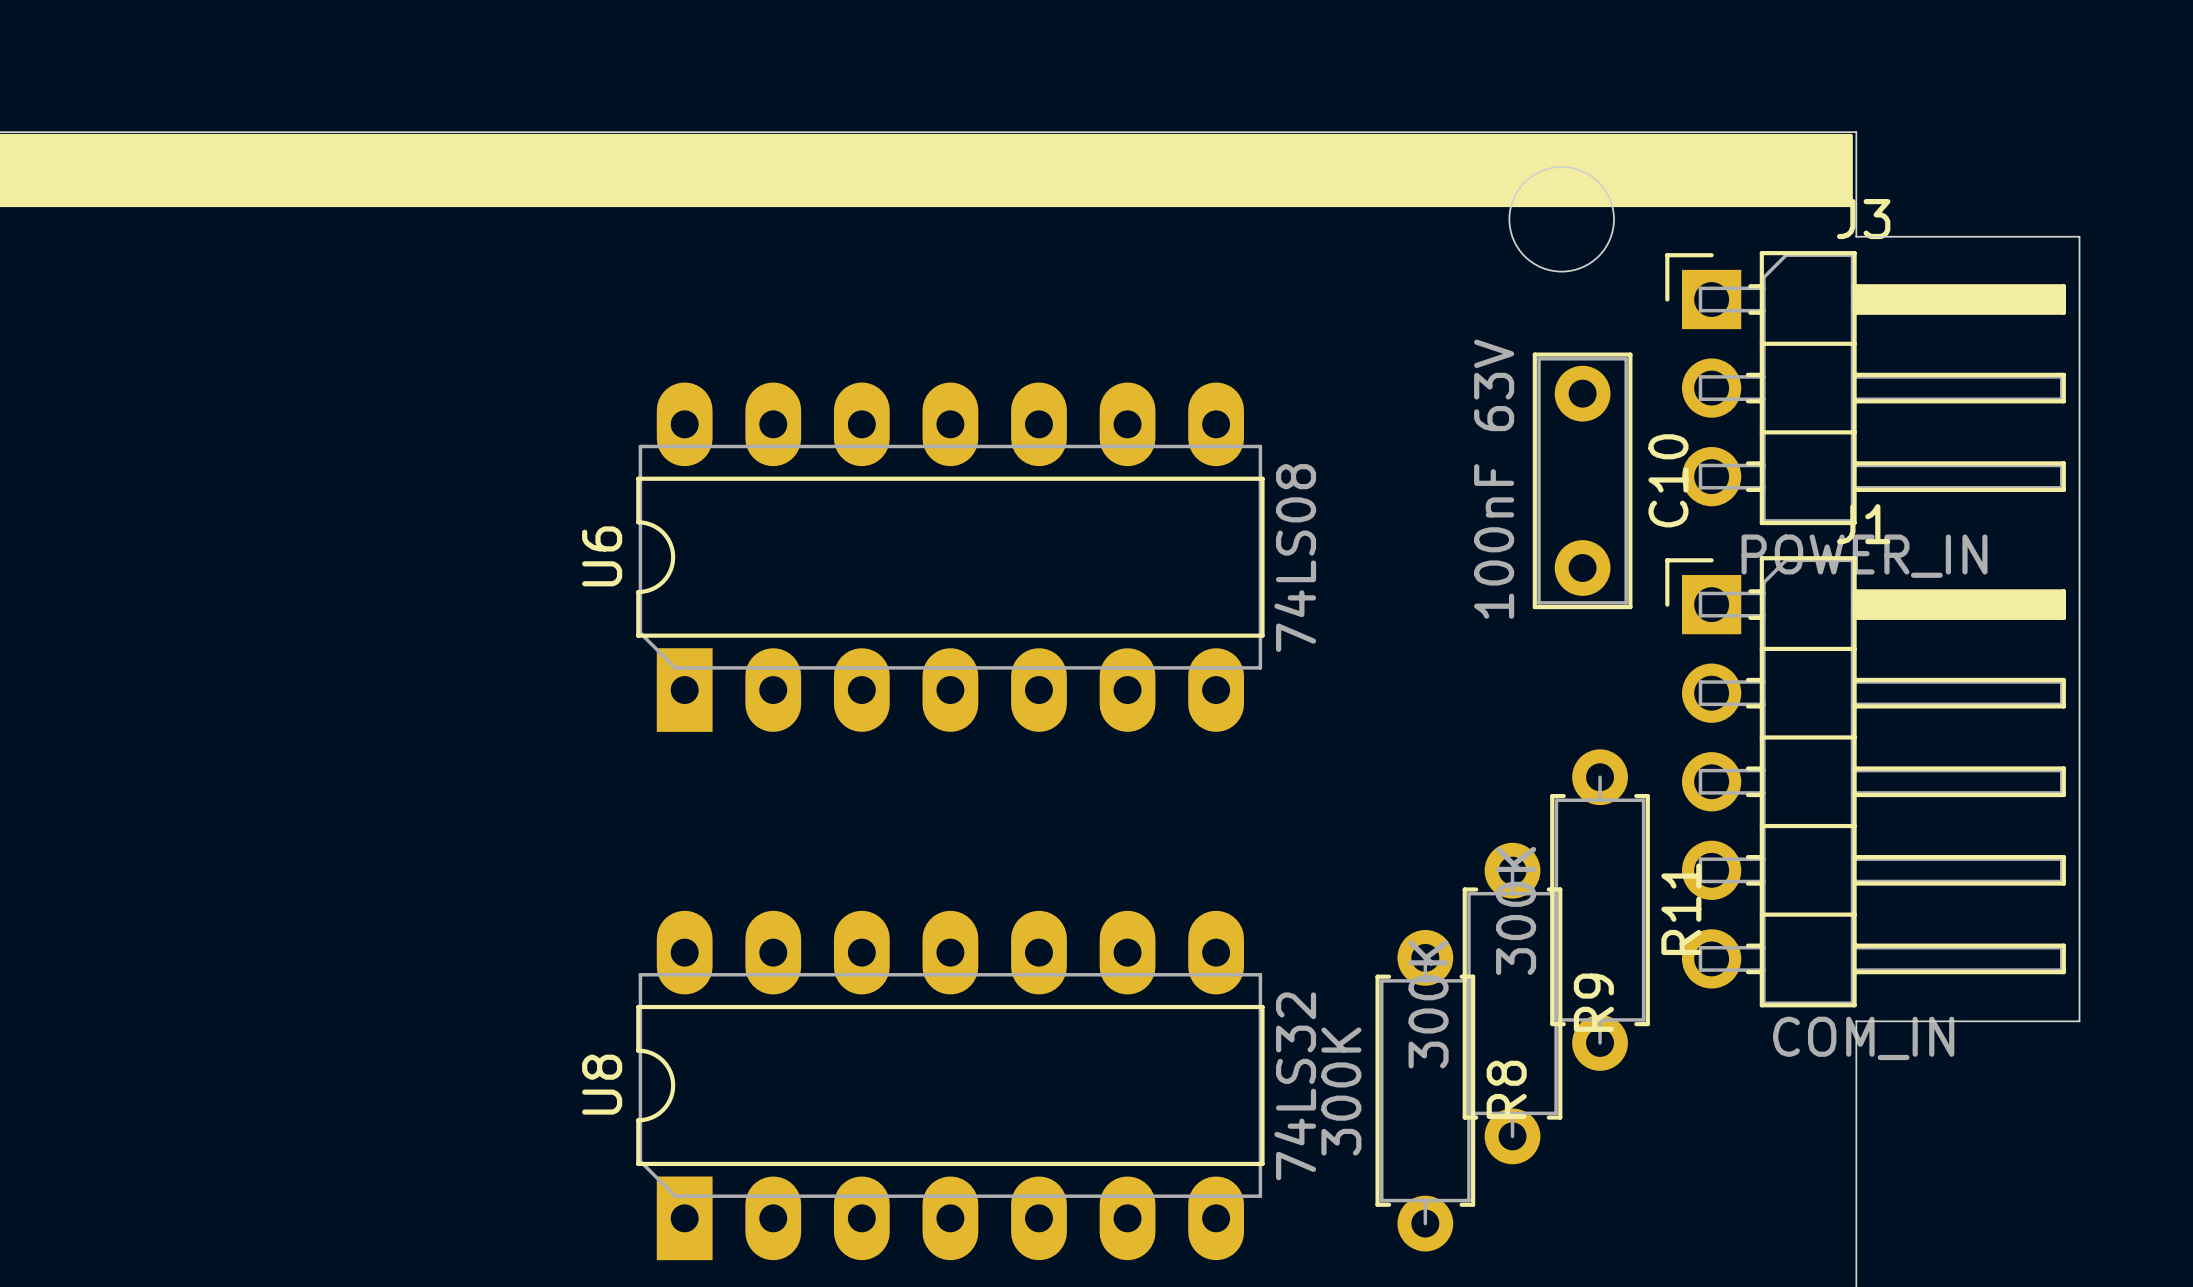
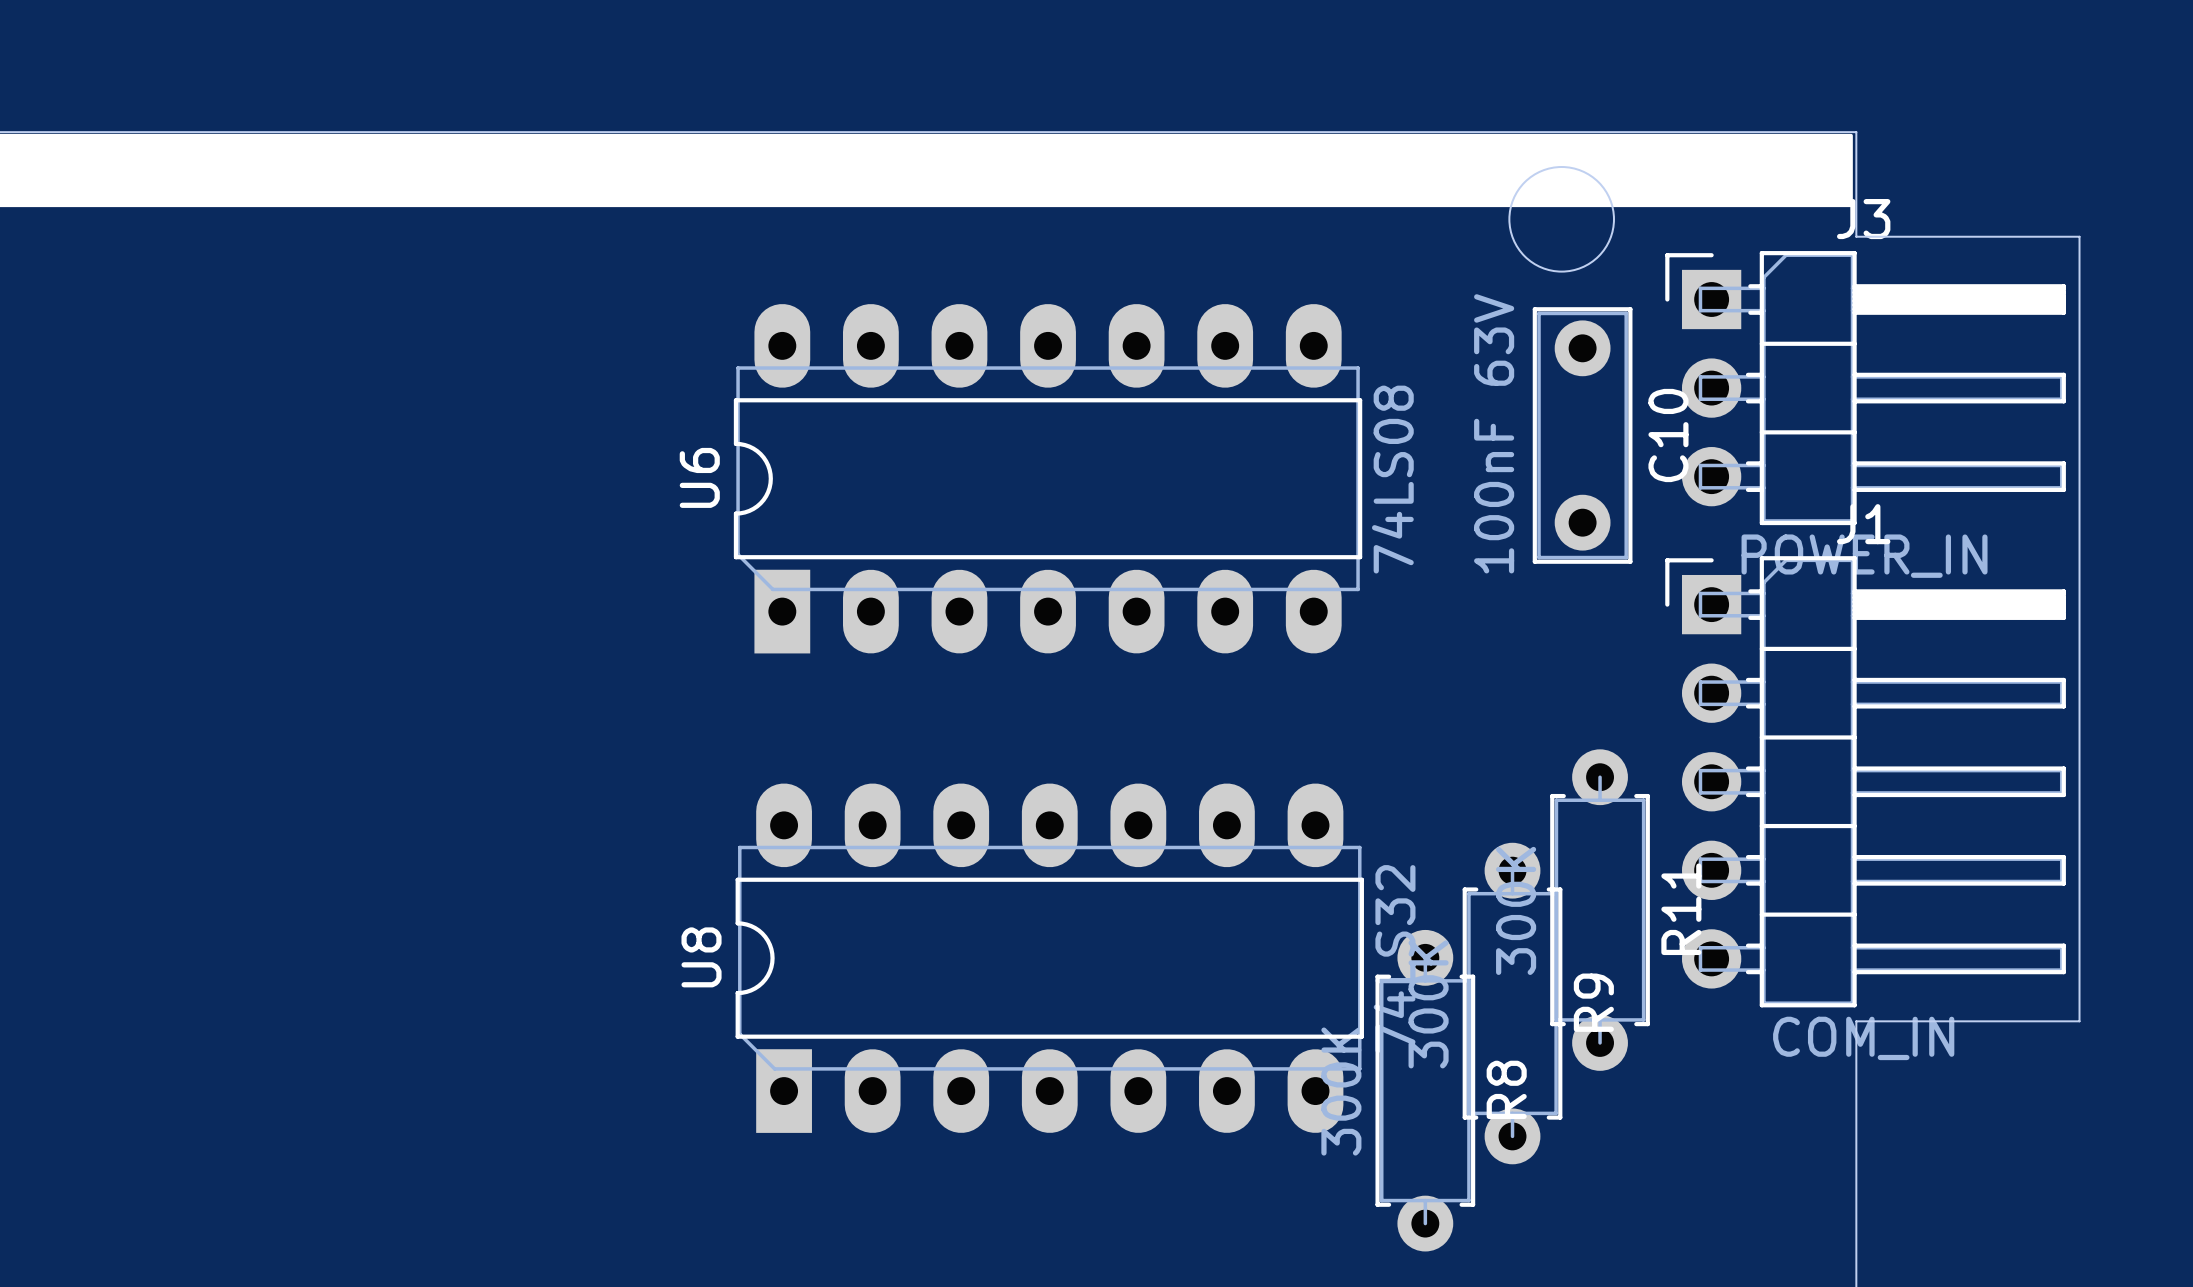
C10 position: (1582, 480) -> (1582, 435)
U6 position: (950, 557) -> (1048, 478)
U8 position: (950, 1085) -> (1049, 958)

